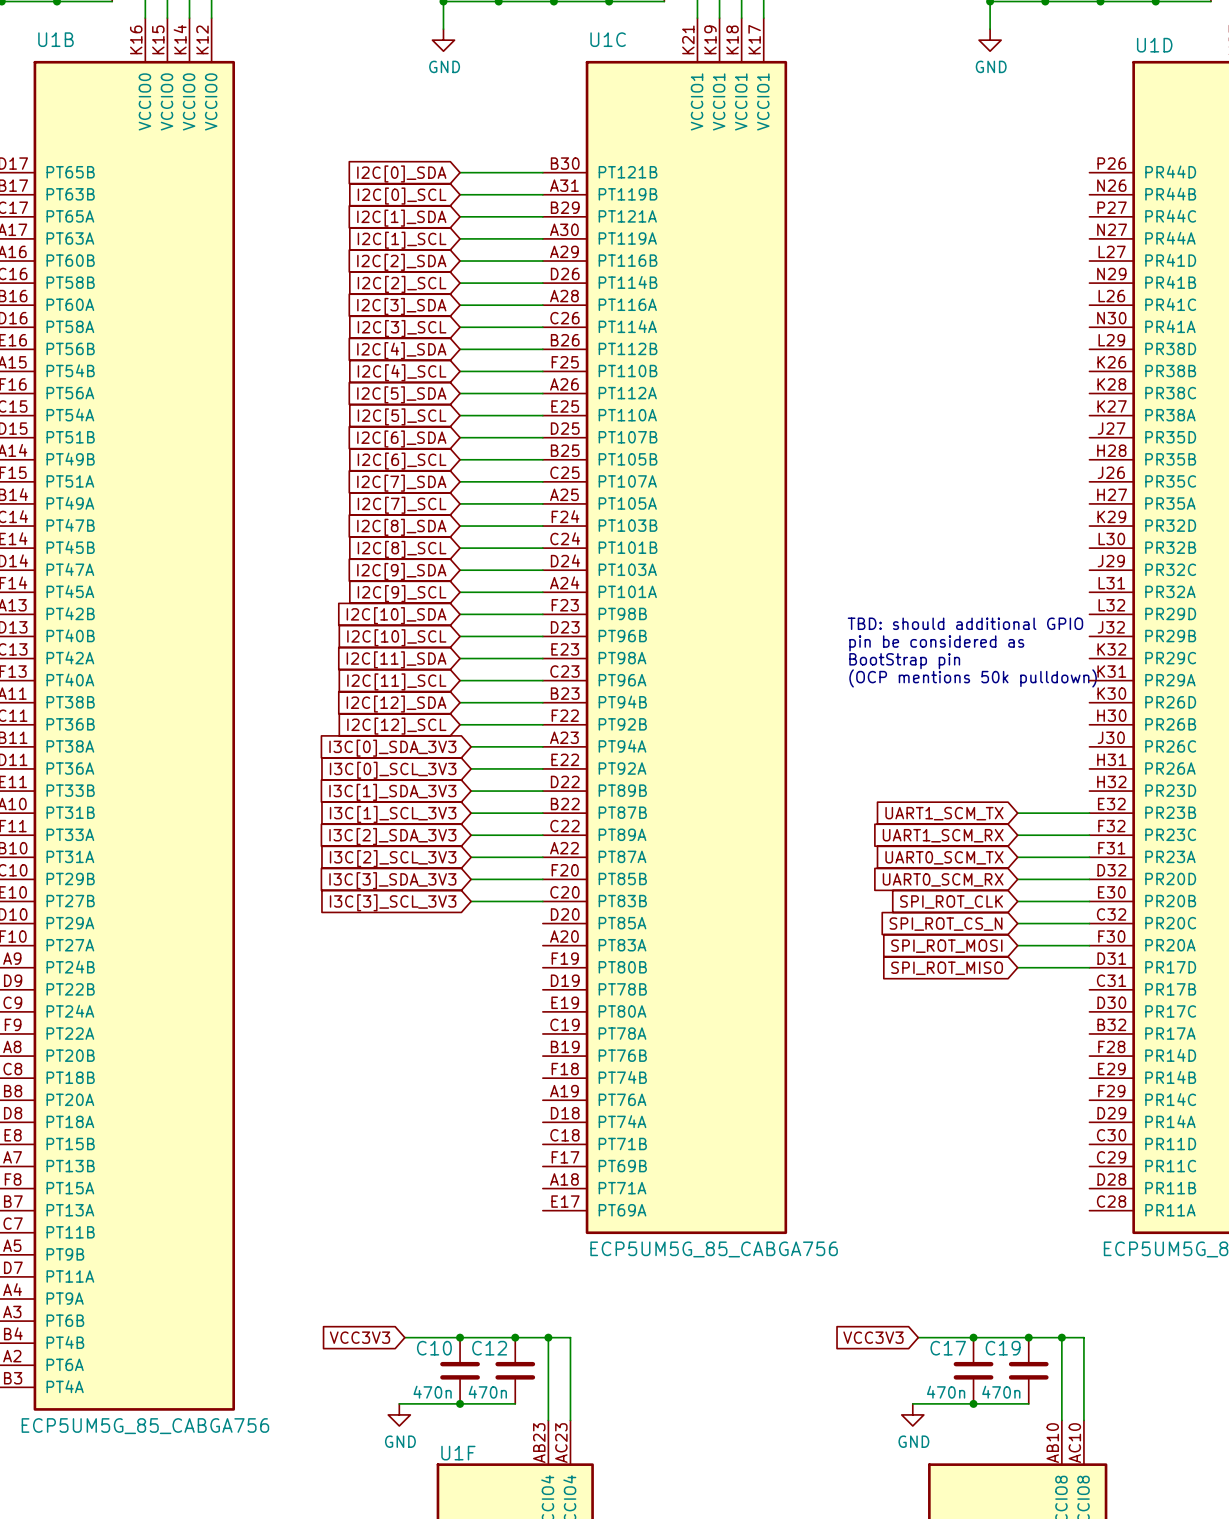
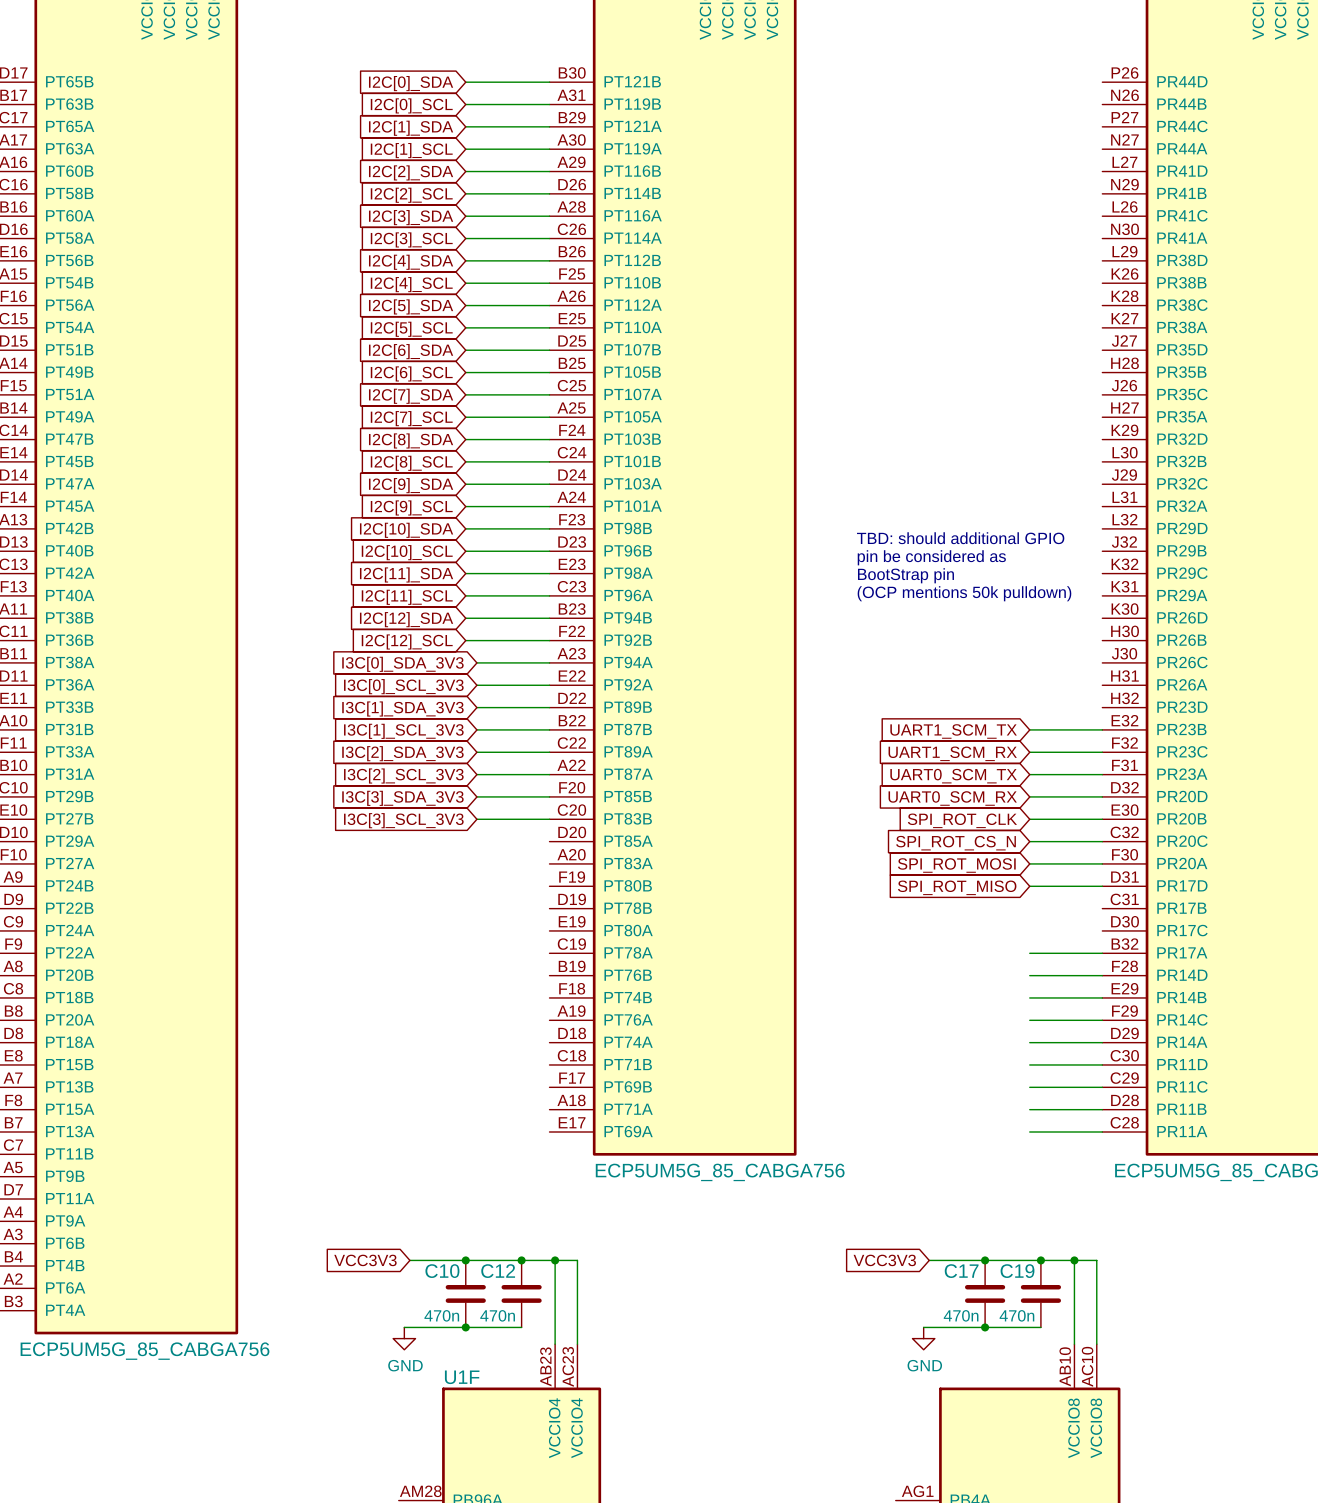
wire: none -> (1029, 953) (1102, 953)
wire: none -> (1029, 975) (1102, 975)
wire: none -> (1029, 997) (1102, 997)
wire: none -> (1029, 1020) (1102, 1020)
wire: none -> (1029, 1042) (1102, 1042)
wire: none -> (1029, 1064) (1102, 1064)
wire: none -> (1029, 1087) (1102, 1087)
wire: none -> (1029, 1109) (1102, 1109)
wire: none -> (1029, 1131) (1102, 1131)

